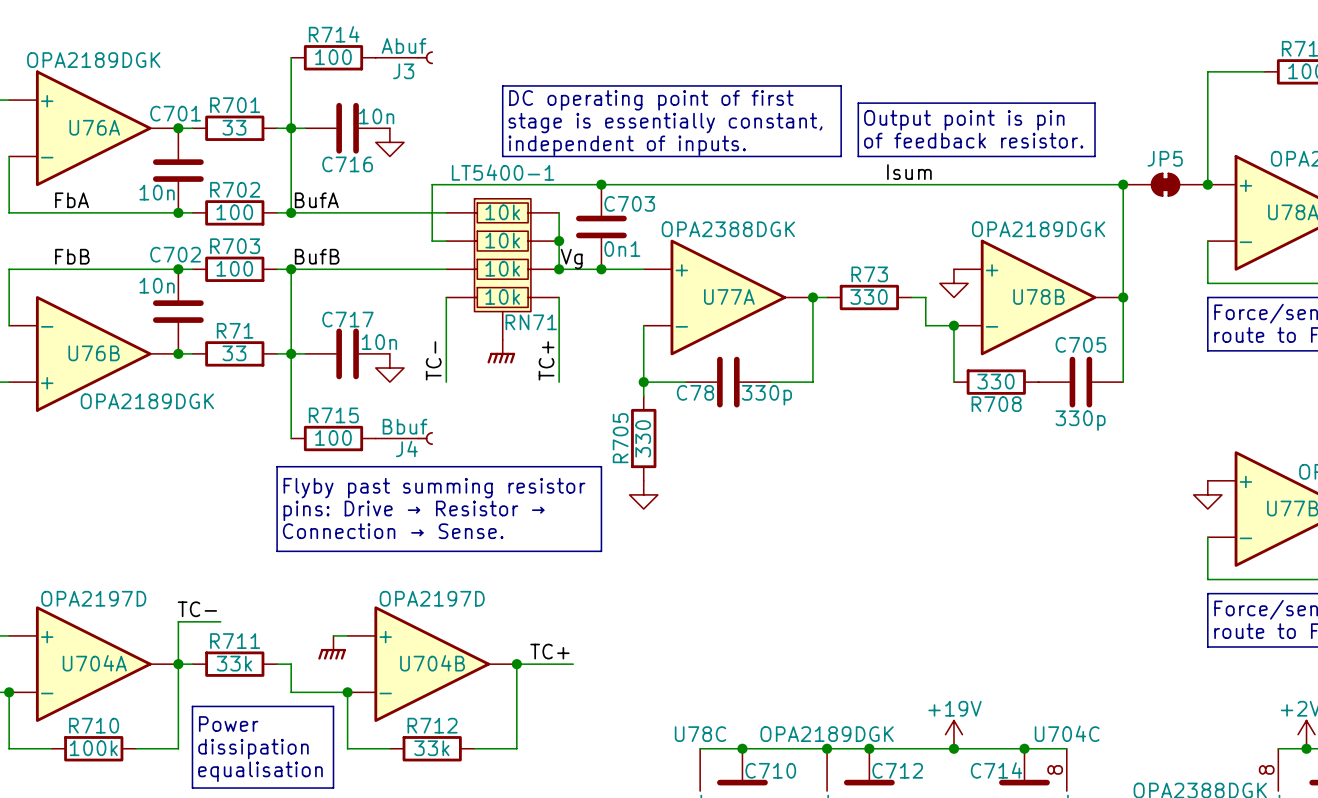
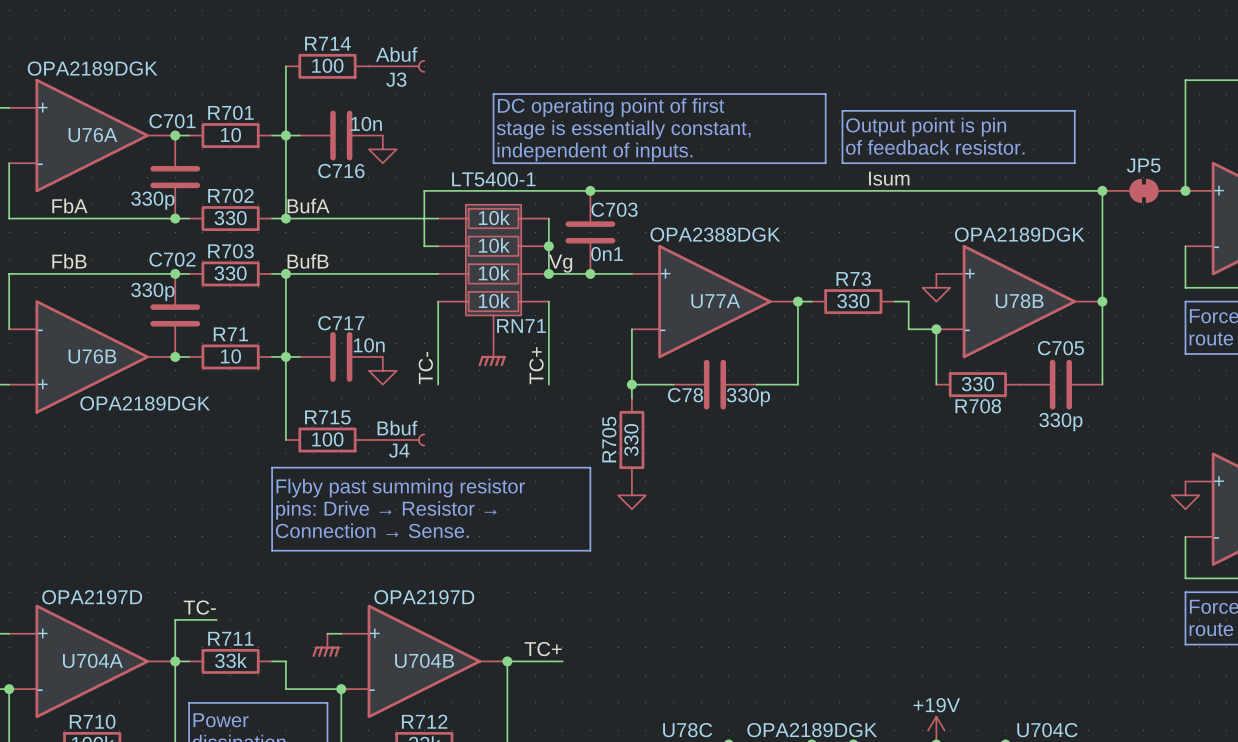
R701 value: 33 (234, 127) -> 10 (230, 135)
C701 value: 10n (157, 192) -> 330p (152, 200)
R702 value: 100 (234, 212) -> 330 (230, 218)
R703 value: 100 (234, 268) -> 330 (230, 273)
C702 value: 10n (157, 285) -> 330p (152, 292)
R71 value: 33 (234, 353) -> 10 (230, 356)

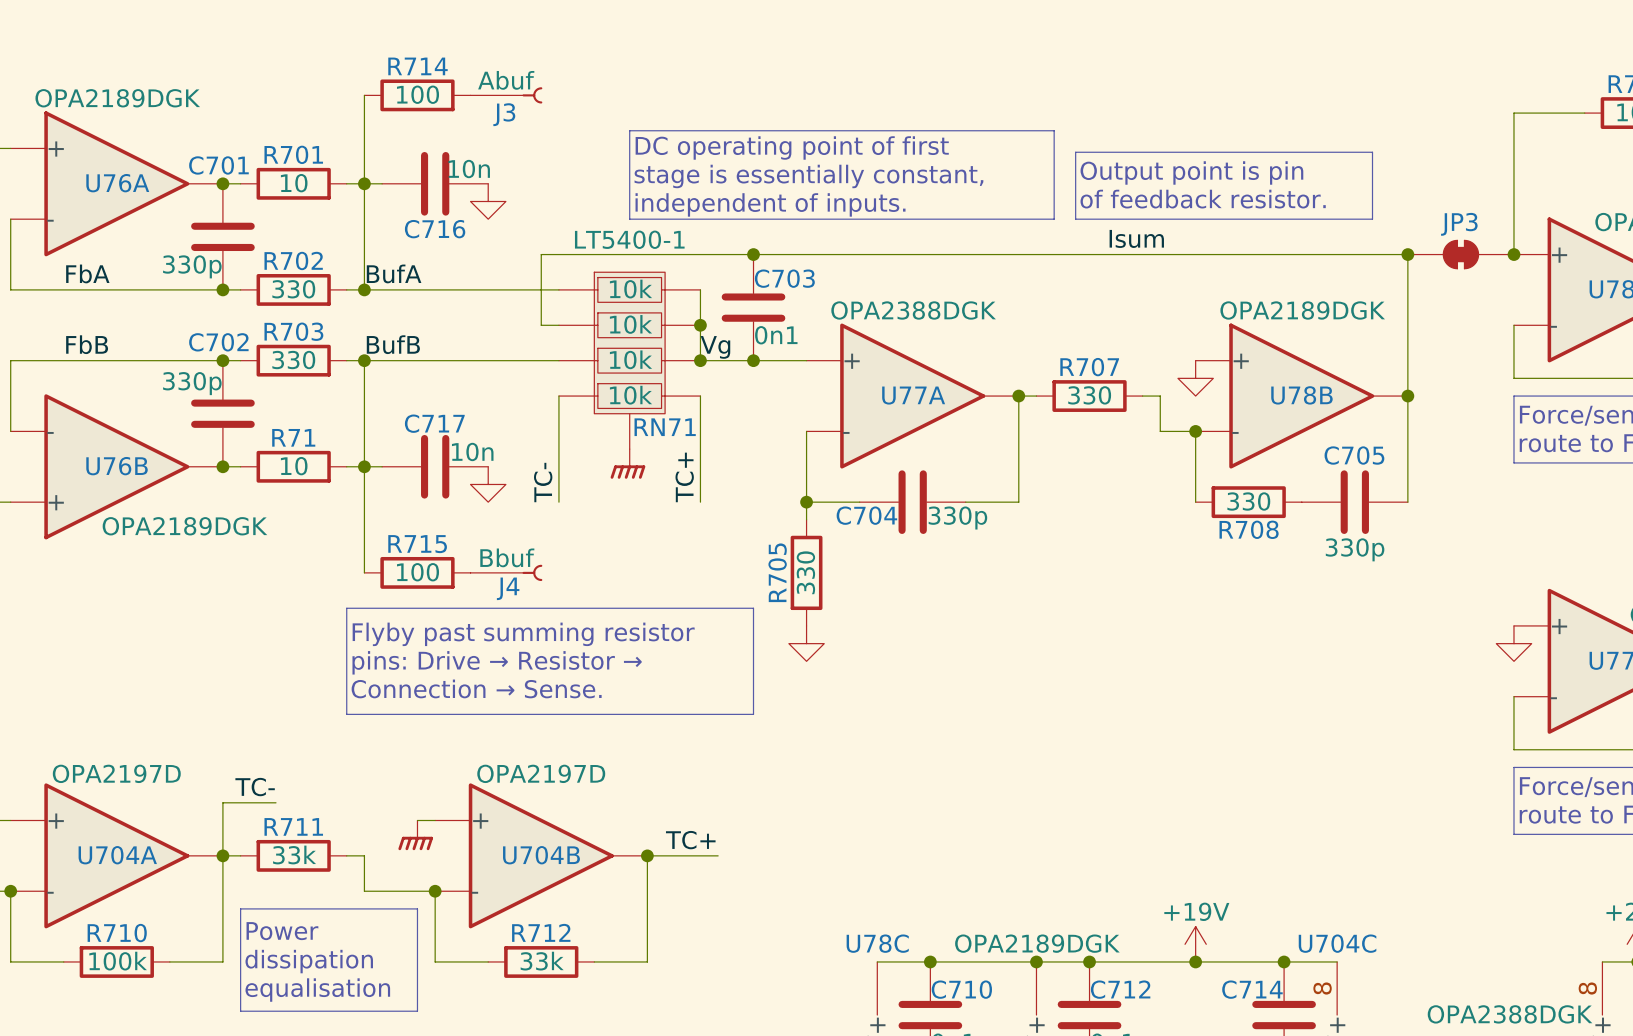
JP5 name: JP5 (1143, 165) -> JP3 (1459, 224)
R73 name: R73 (853, 278) -> R707 (1089, 367)
C78 name: C78 (685, 395) -> C704 (866, 515)

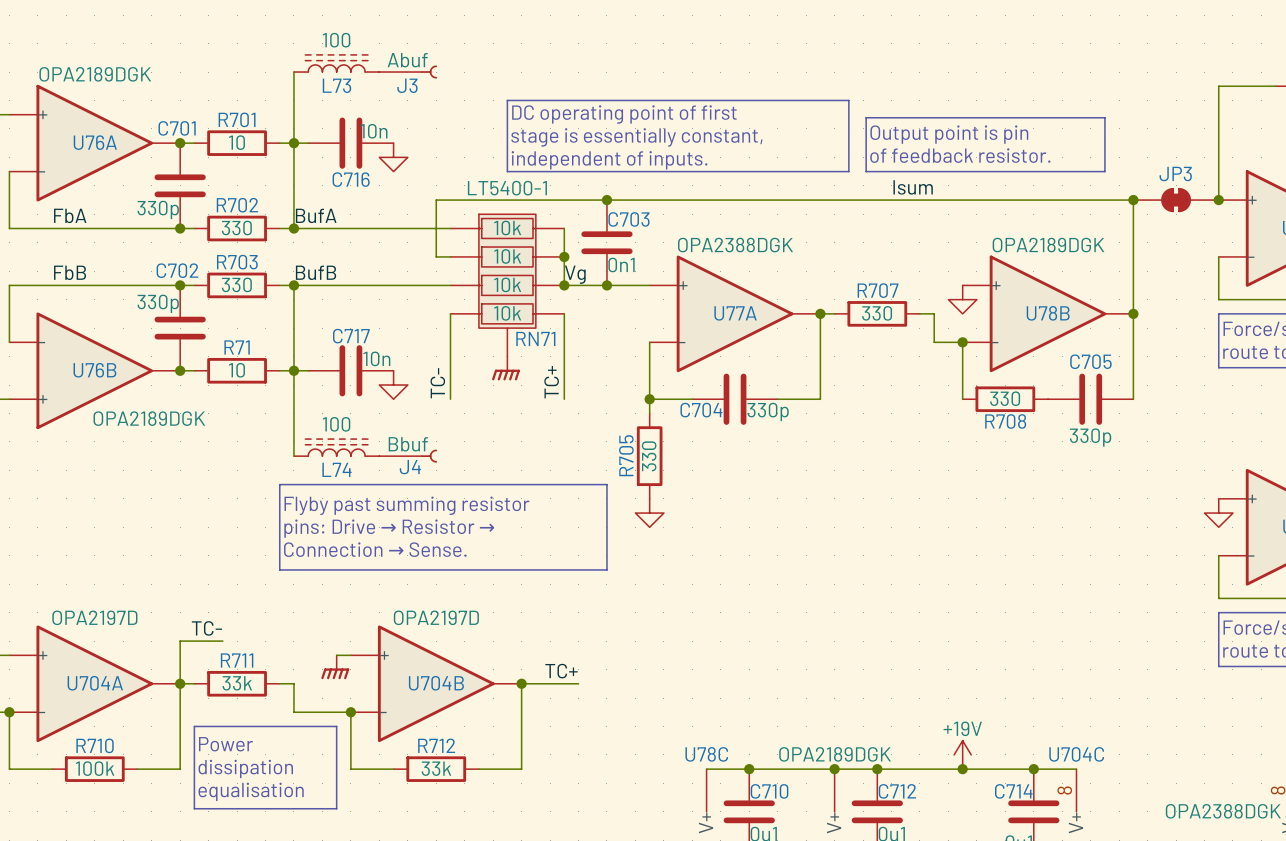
L73: none -> 100 (336, 63)
R714: 100 (417, 95) -> none
L74: none -> 100 (336, 447)
R715: 100 (417, 572) -> none

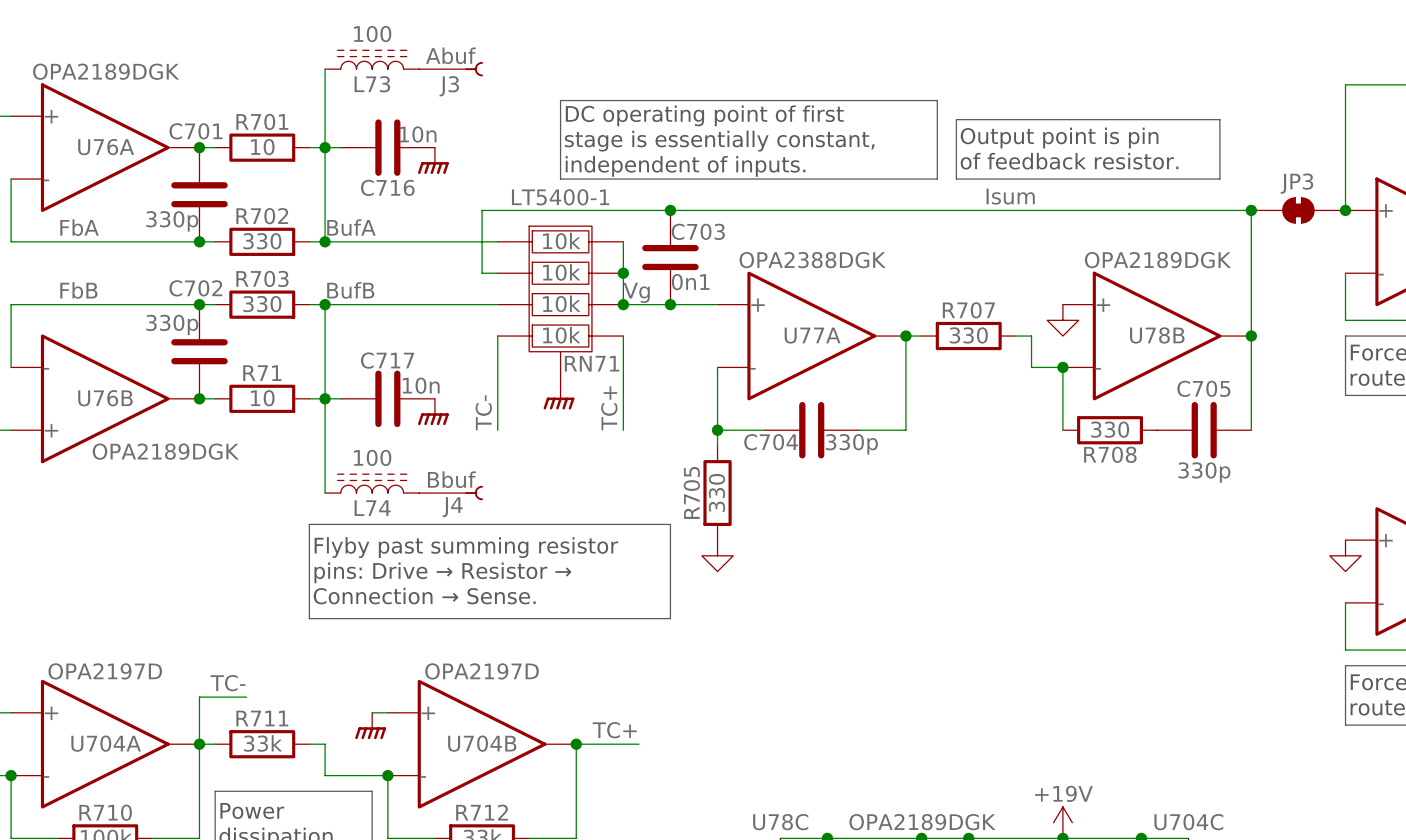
power symbol shape: [379, 143, 408, 172] -> [418, 147, 449, 175]
power symbol shape: [379, 370, 408, 400] -> [418, 398, 449, 426]

